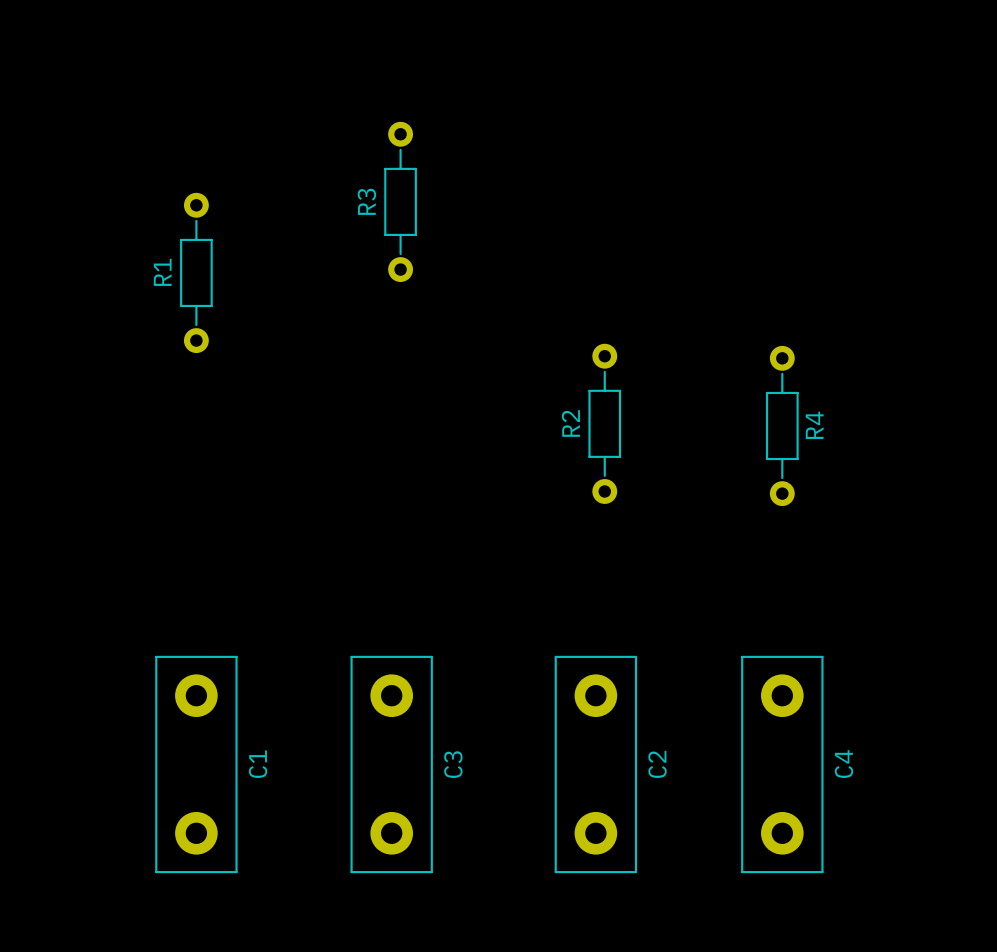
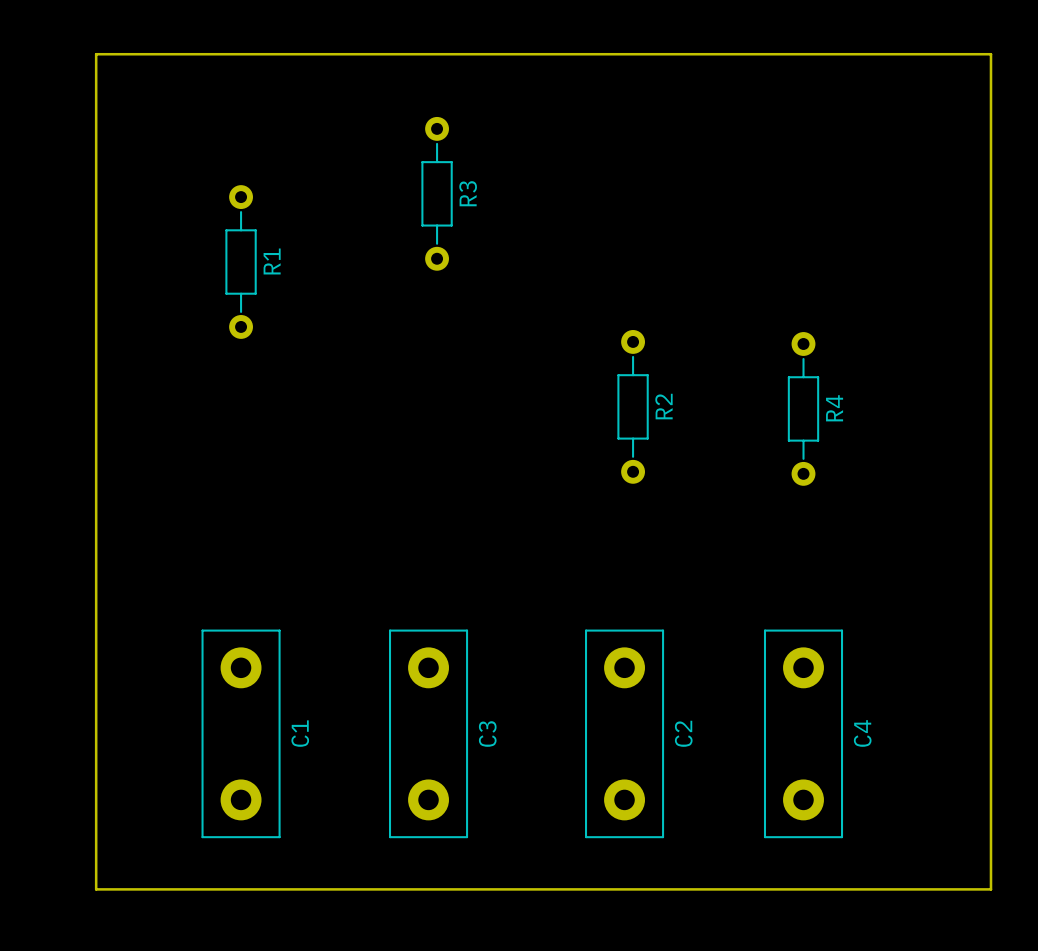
board edge: none -> (96, 54) (96, 889) (990, 889) (990, 54) (96, 54)
R3 name position: R3 (366, 201) -> R3 (468, 193)
R1 name position: R1 (162, 272) -> R1 (272, 261)
R2 name position: R2 (570, 423) -> R2 (663, 406)

